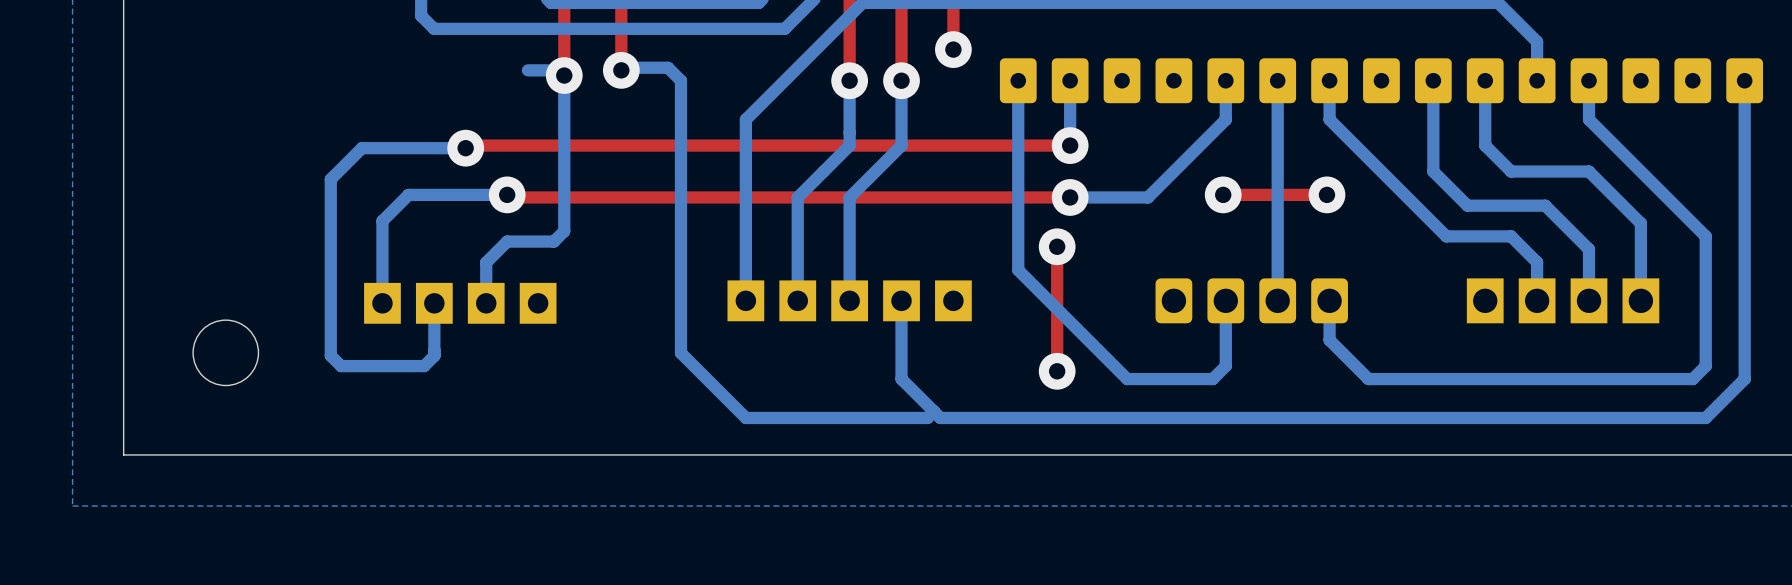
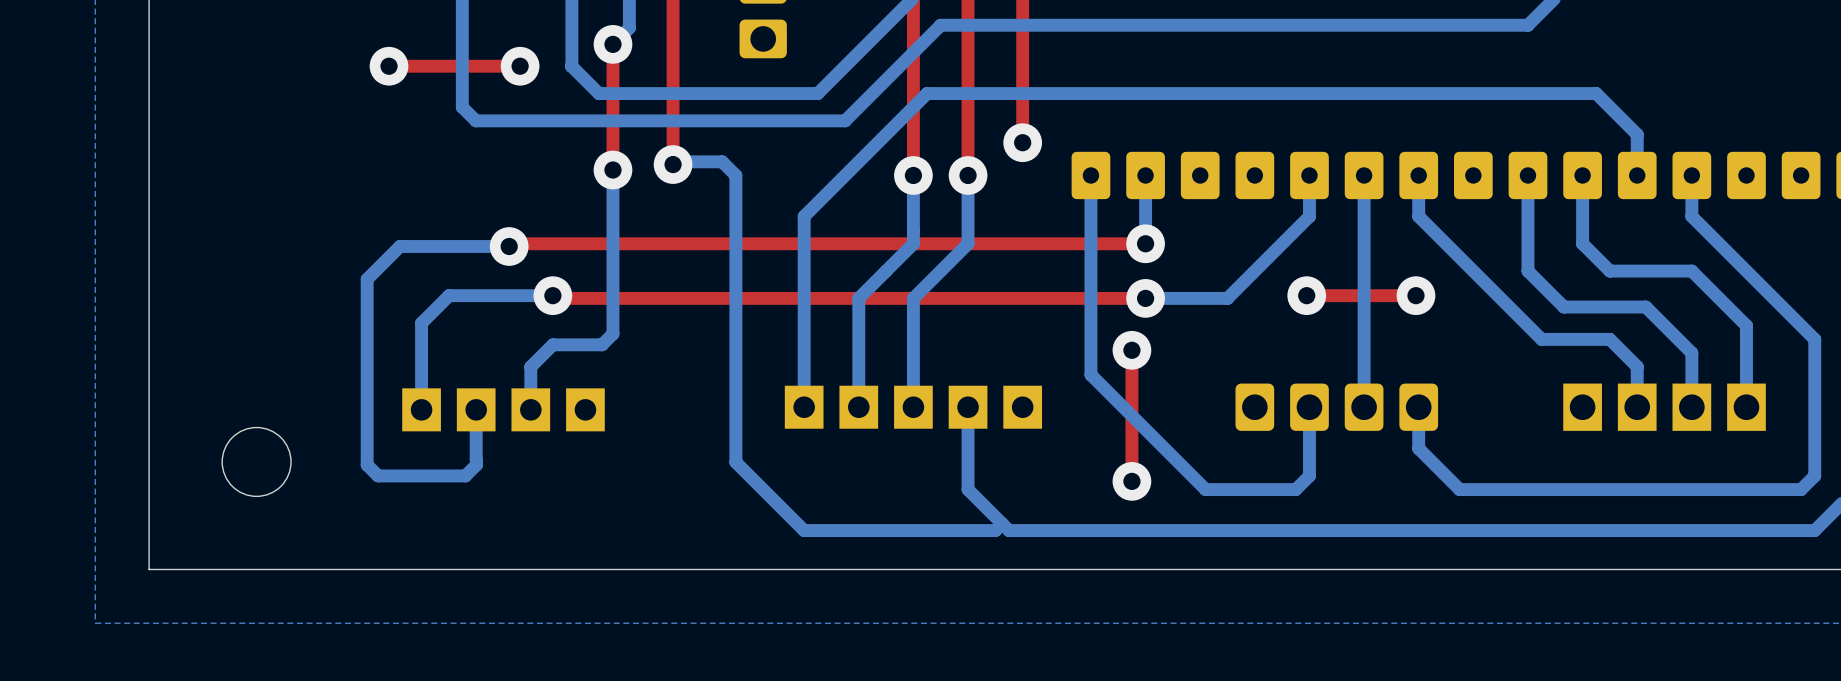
bottom track: (559, 70) (527, 70) -> none

